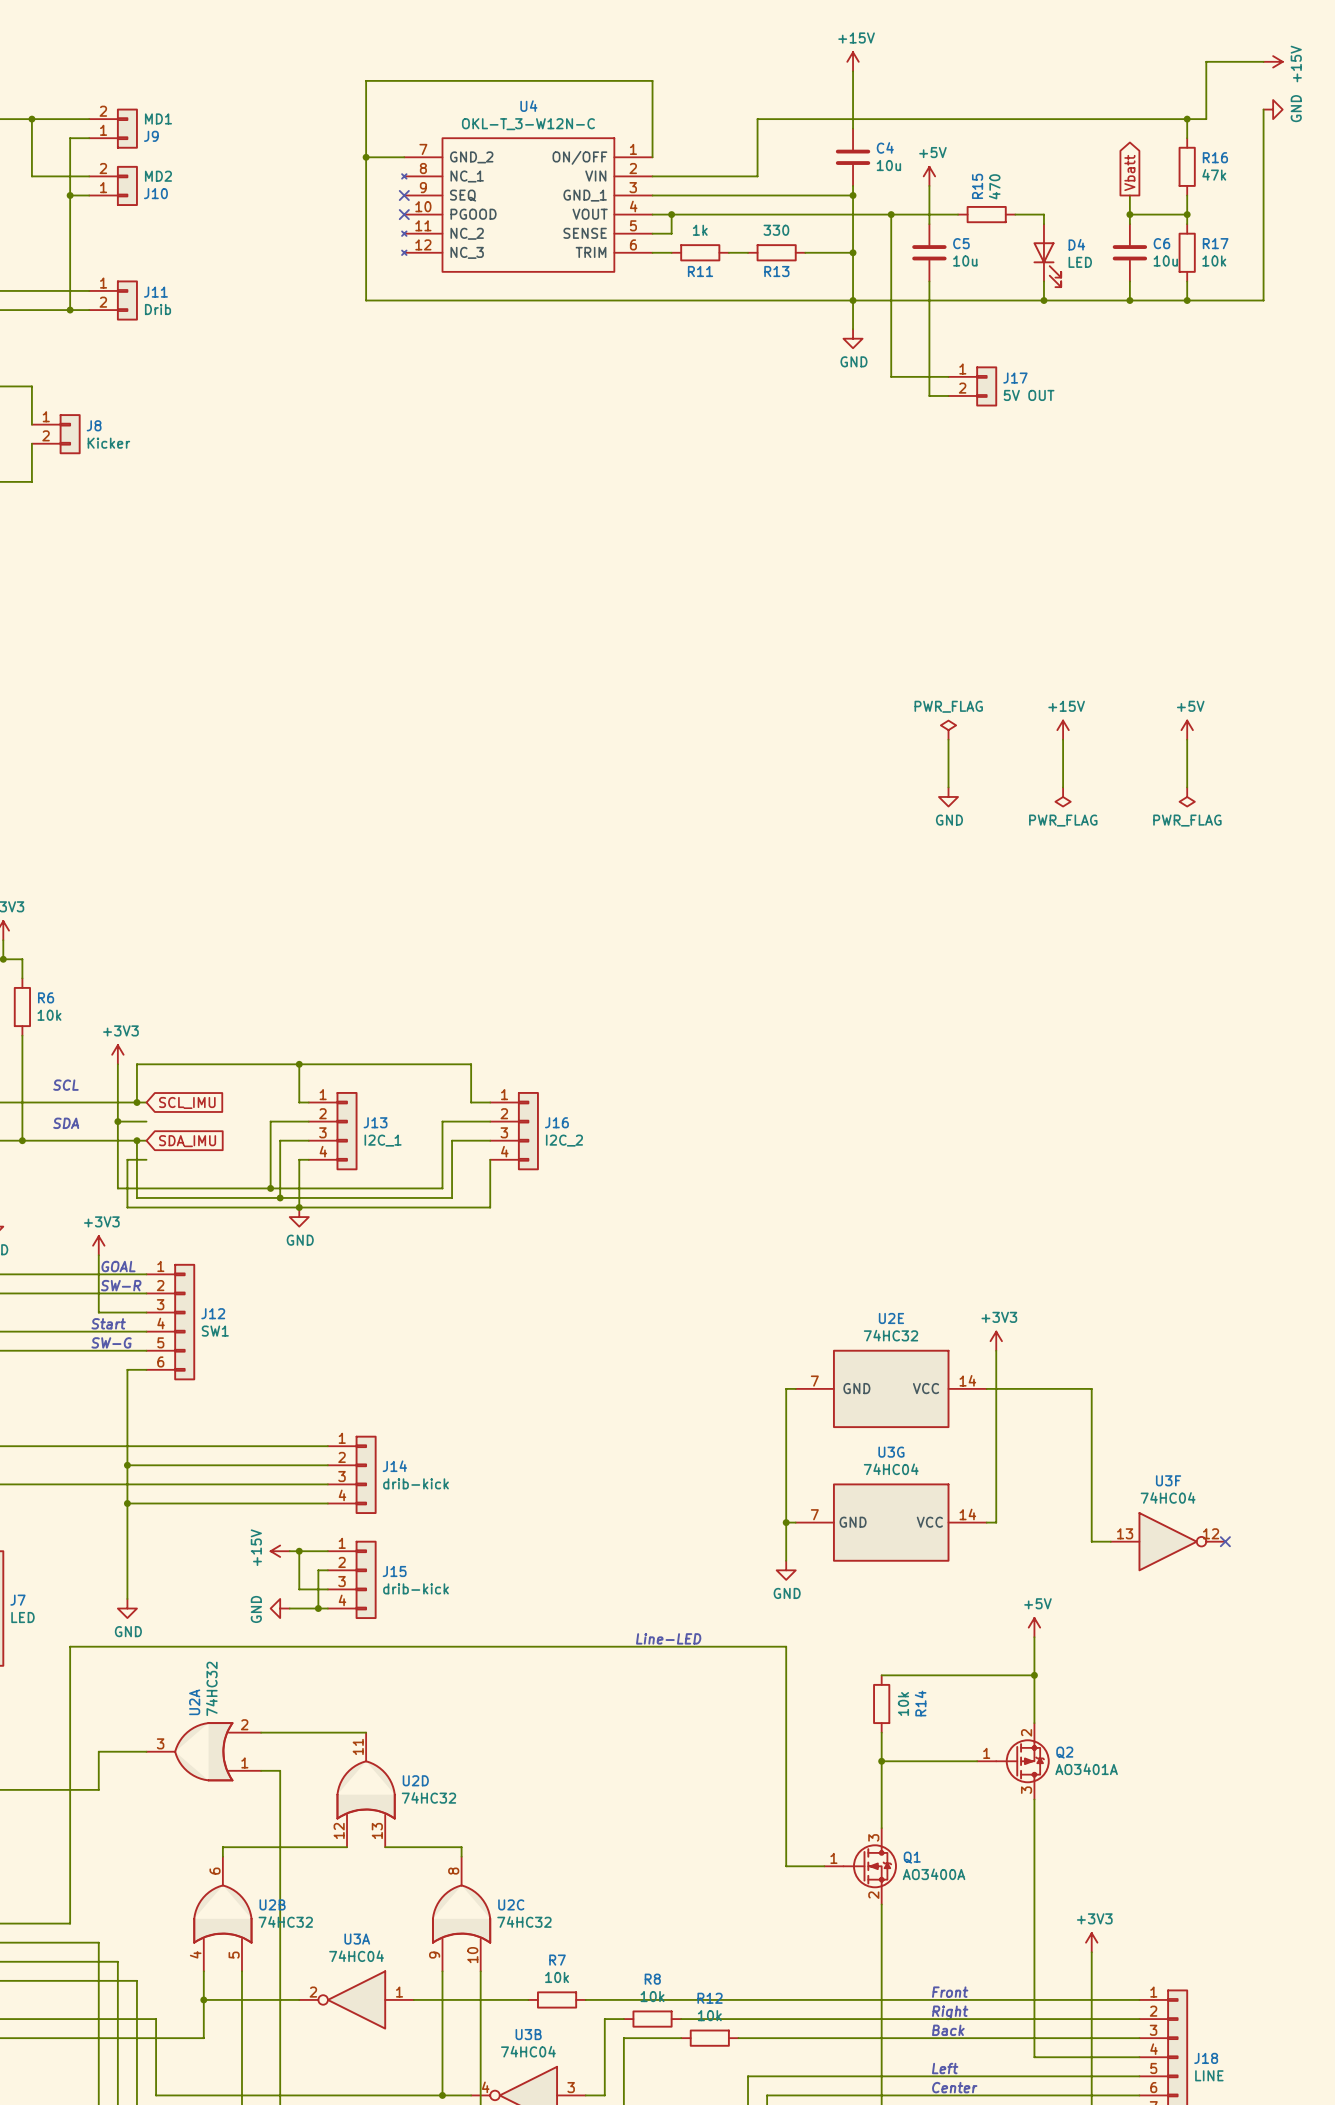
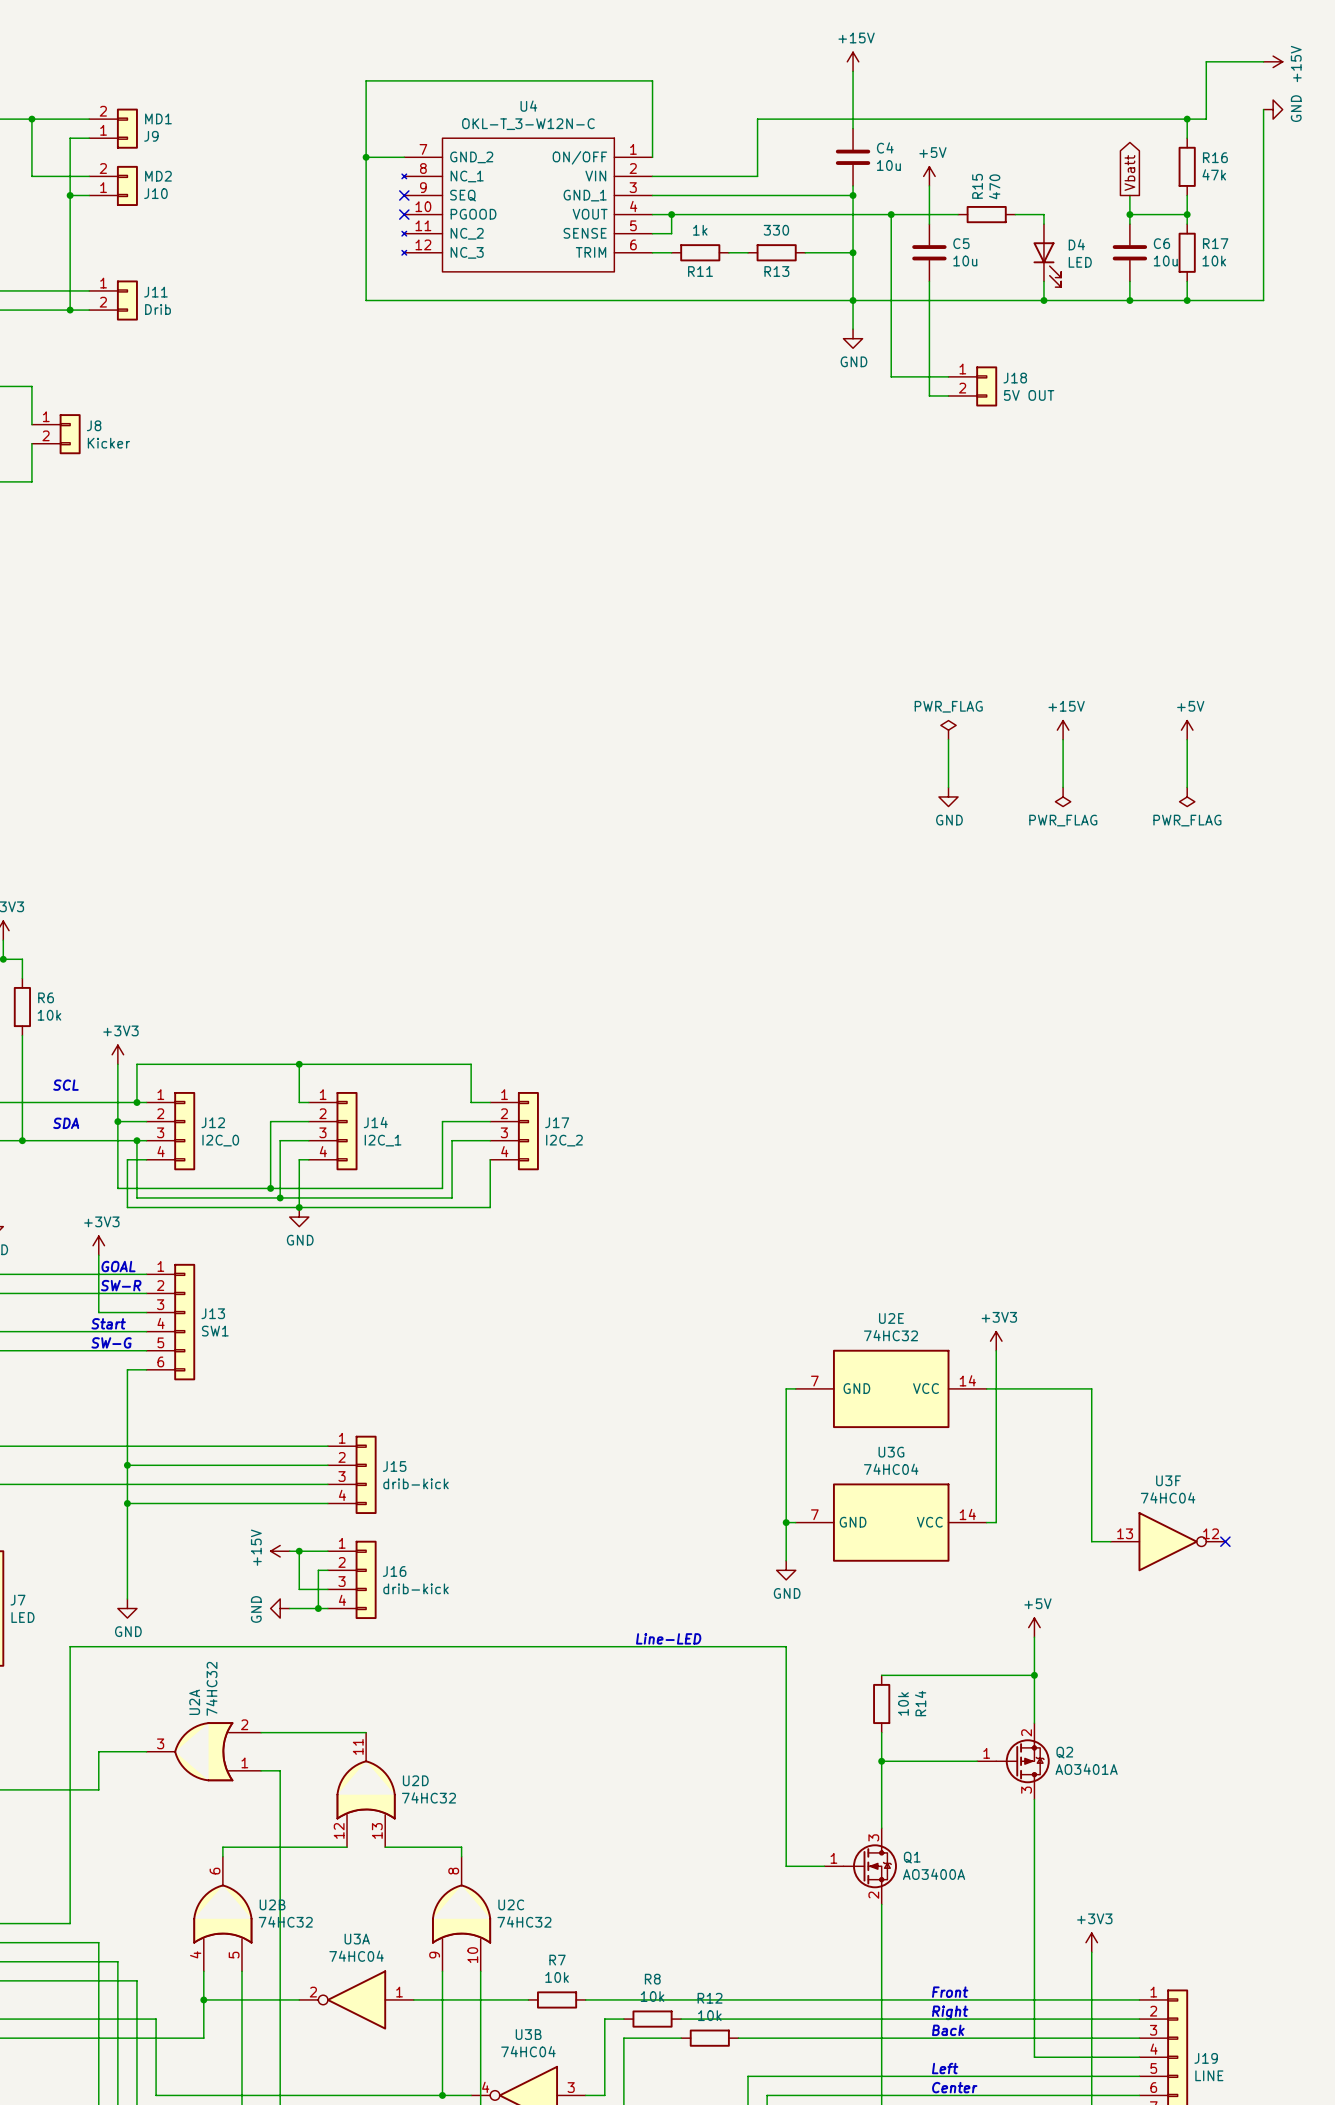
J17 name: J17 (1015, 378) -> J18 (1015, 378)
global label: SCL_IMU (187, 1102) -> none
J13 name: J13 (375, 1122) -> J14 (375, 1122)
J16 name: J16 (556, 1122) -> J17 (557, 1122)
J12: none -> I2C_0 (170, 1131)
global label: SDA_IMU (187, 1141) -> none
J12 name: J12 (213, 1313) -> J13 (213, 1313)
J14 name: J14 (394, 1466) -> J15 (394, 1466)
J15 name: J15 (394, 1571) -> J16 (394, 1571)
J18 name: J18 (1206, 2058) -> J19 (1206, 2058)

